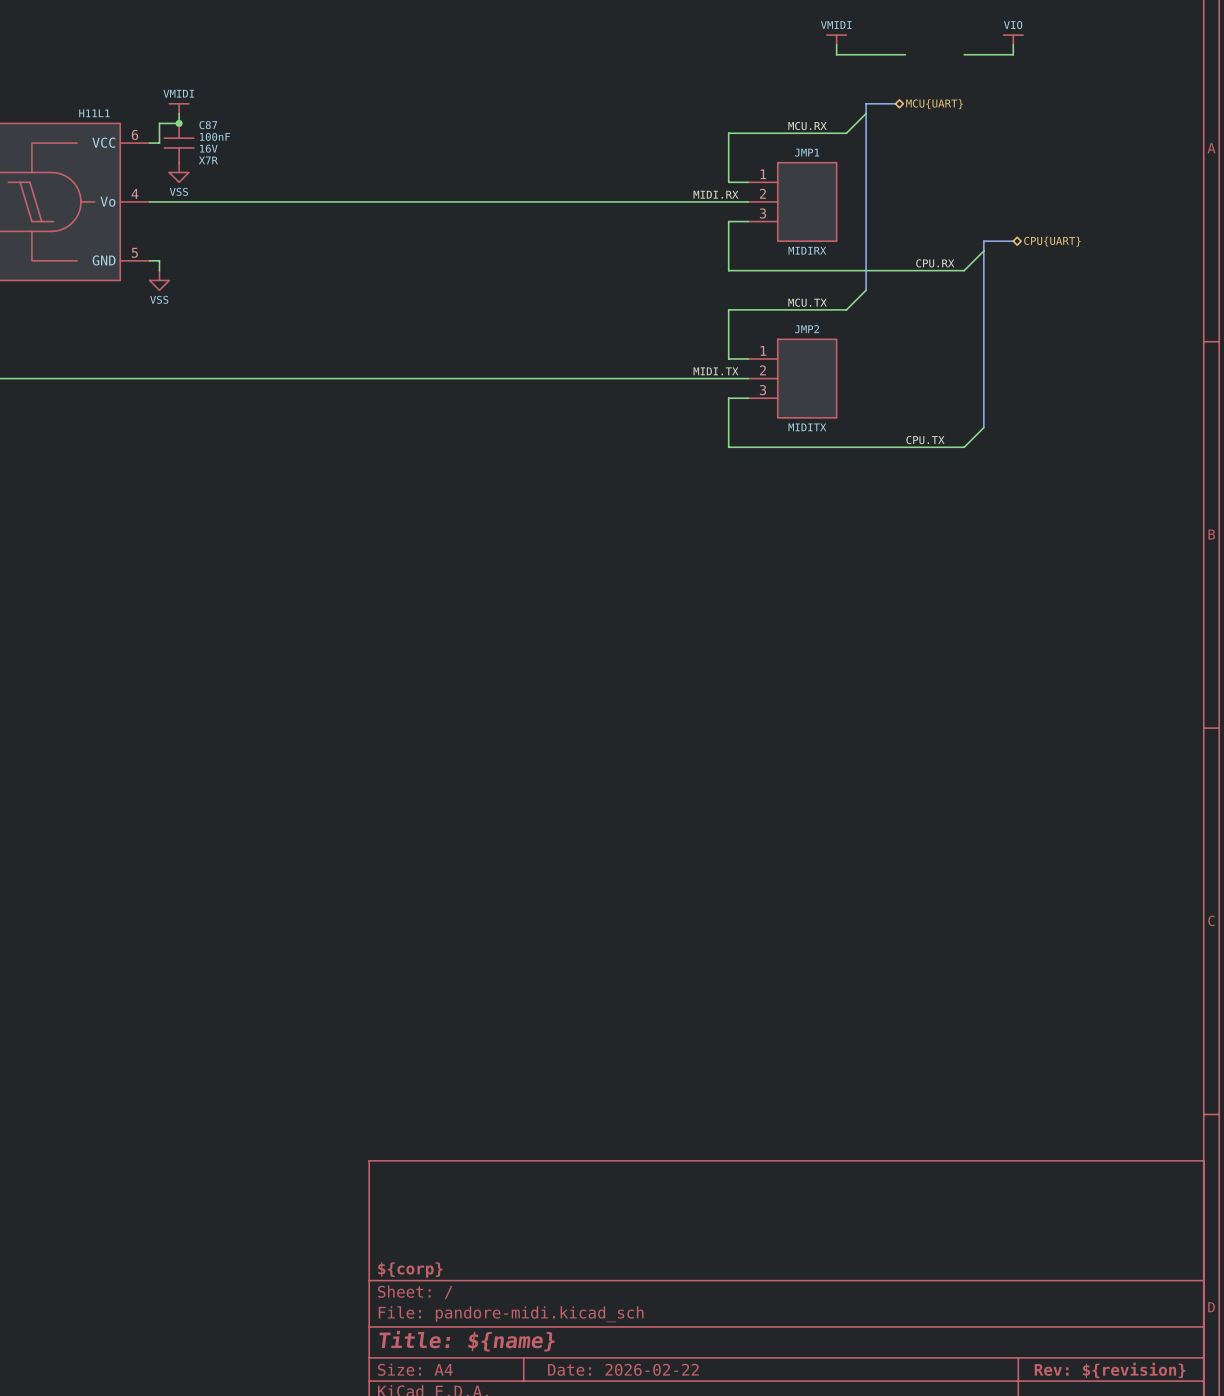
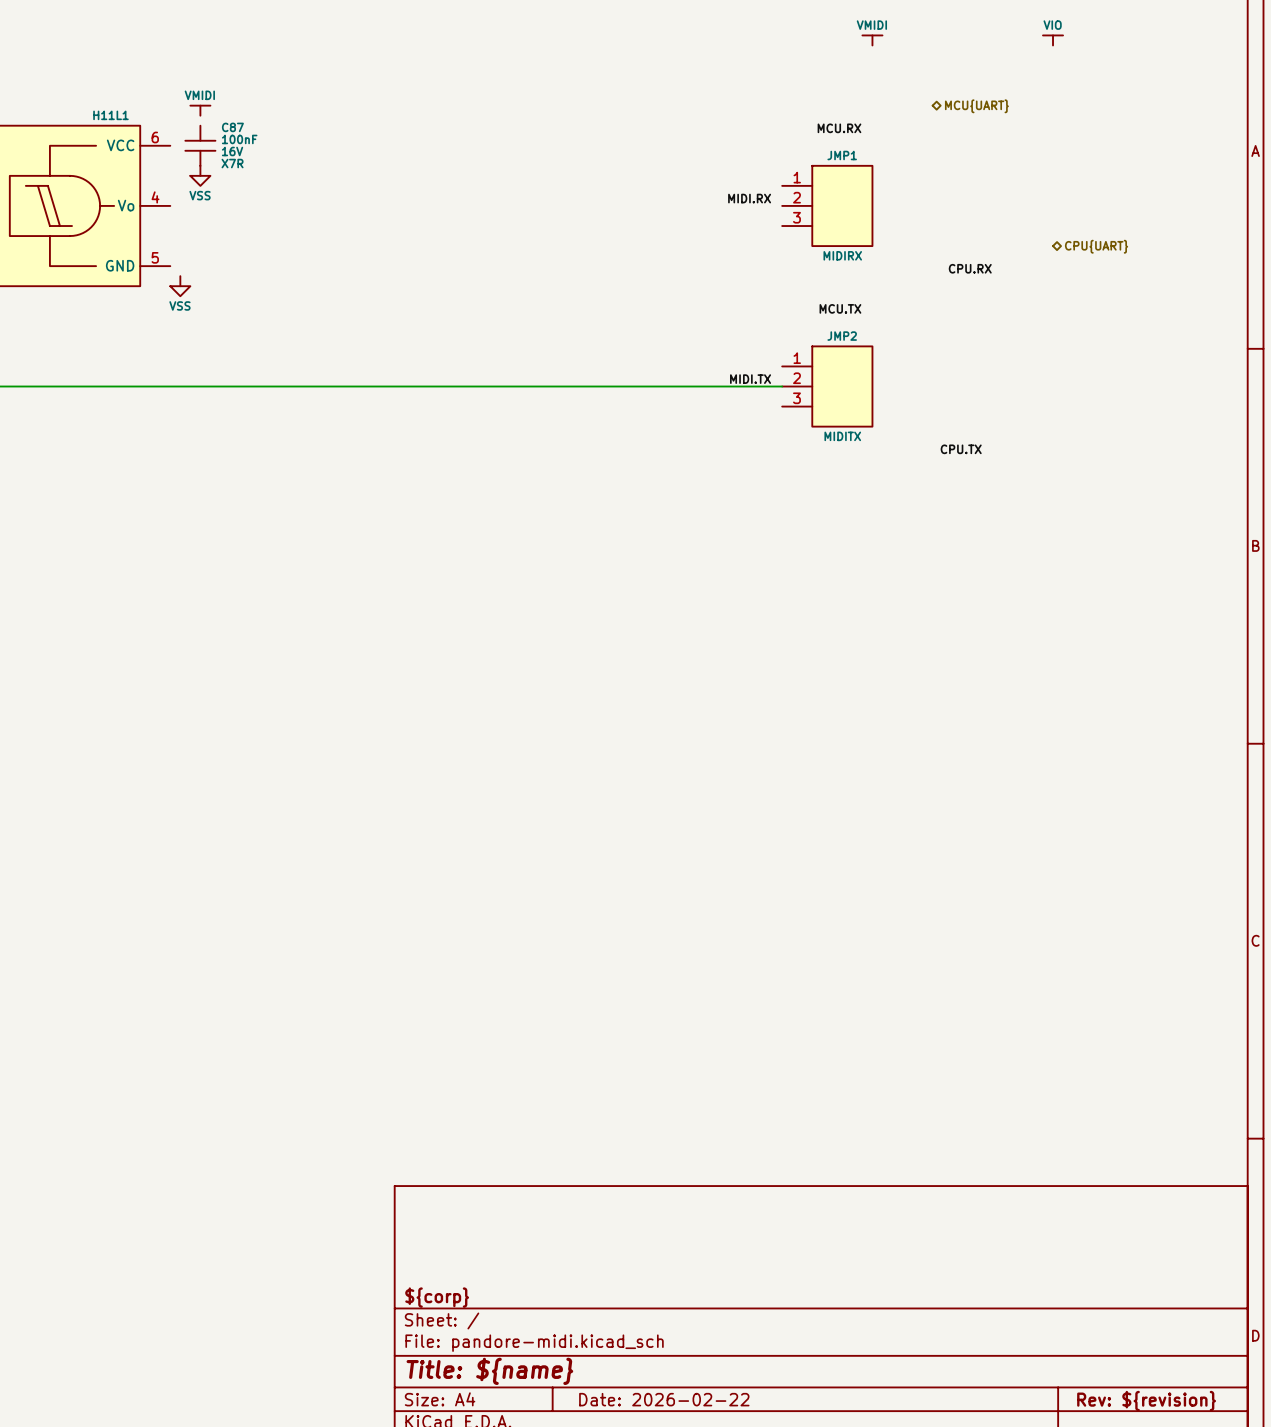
wire: (836, 44) (836, 54) (905, 54) -> none
wire: (1013, 44) (1013, 54) (964, 54) -> none
bus: (895, 103) (866, 103) (866, 290) -> none
wire: (179, 113) (179, 123) (159, 123) (159, 143) (149, 143) -> none
wire: (866, 113) (846, 133) (728, 133) (728, 182) (748, 182) -> none
junction: (179, 123) -> none
wire: (149, 201) (748, 201) -> none
wire: (748, 221) (728, 221) (728, 270) (964, 270) (983, 251) -> none
bus: (1013, 241) (983, 241) (983, 427) -> none
wire: (149, 260) (159, 260) (159, 270) -> none
wire: (866, 290) (846, 309) (728, 309) (728, 358) (748, 358) -> none
wire: (748, 398) (728, 398) (728, 447) (964, 447) (983, 427) -> none

